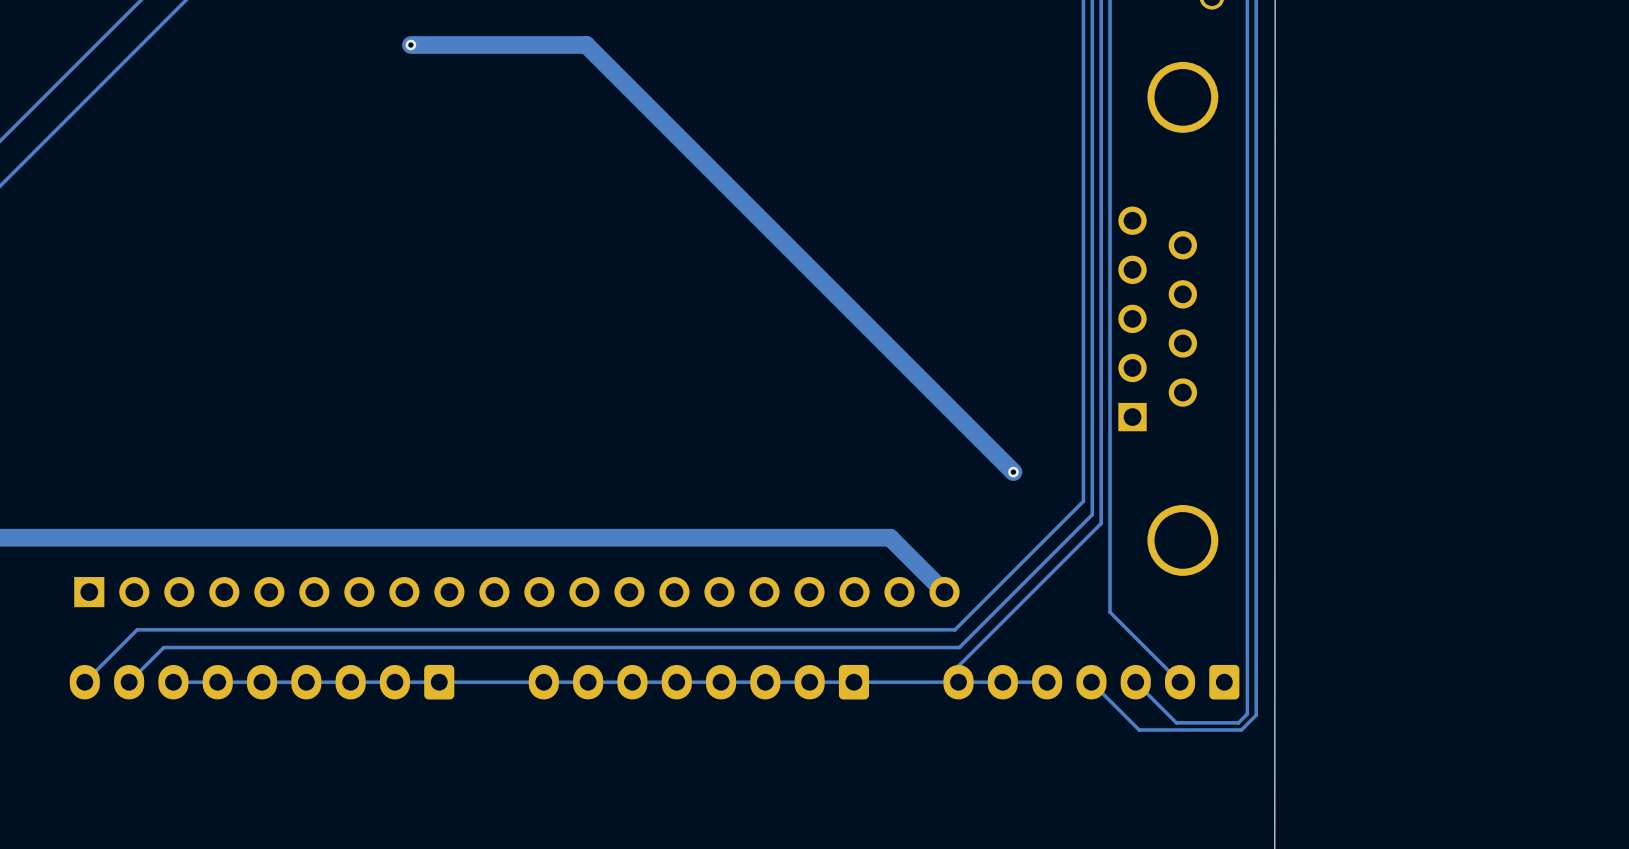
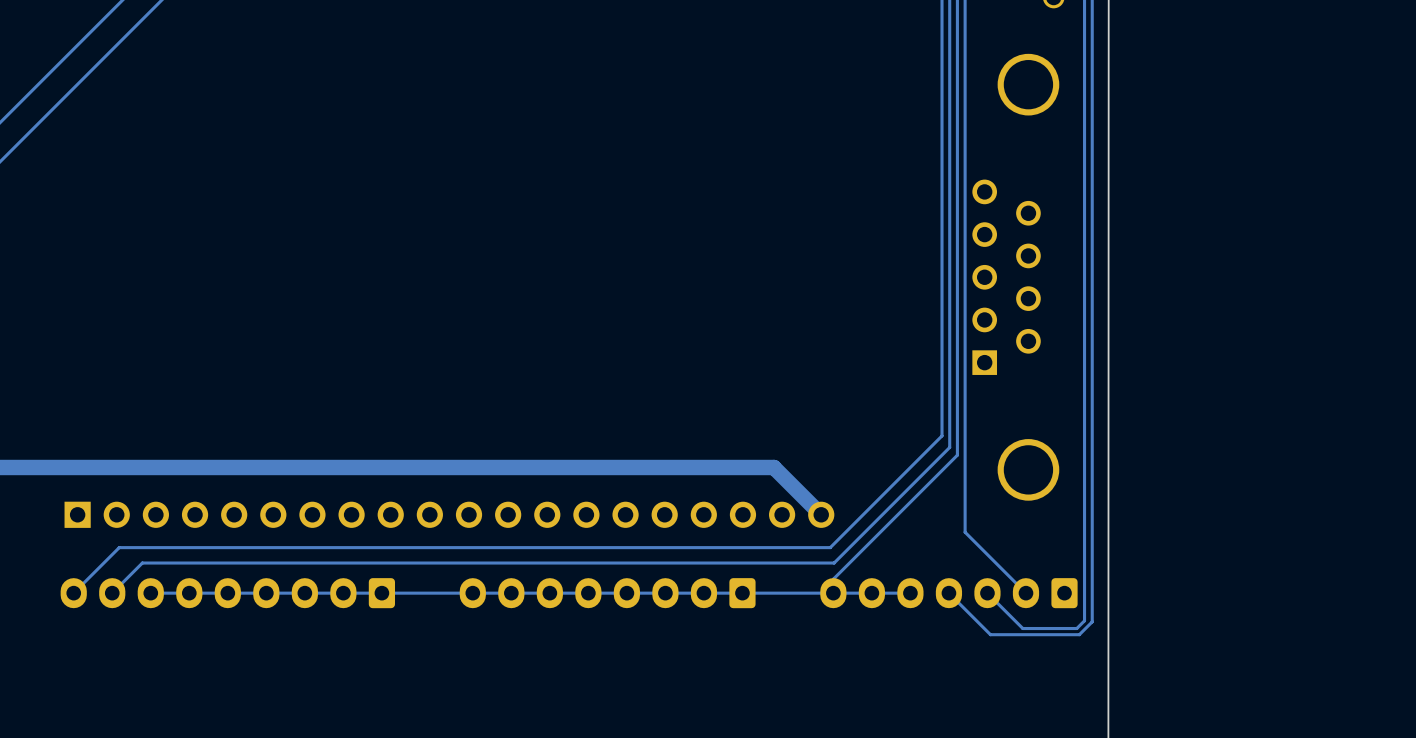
track: (410, 45) (586, 45) (1013, 472) -> none
via: (410, 45) -> none
via: (1013, 472) -> none

